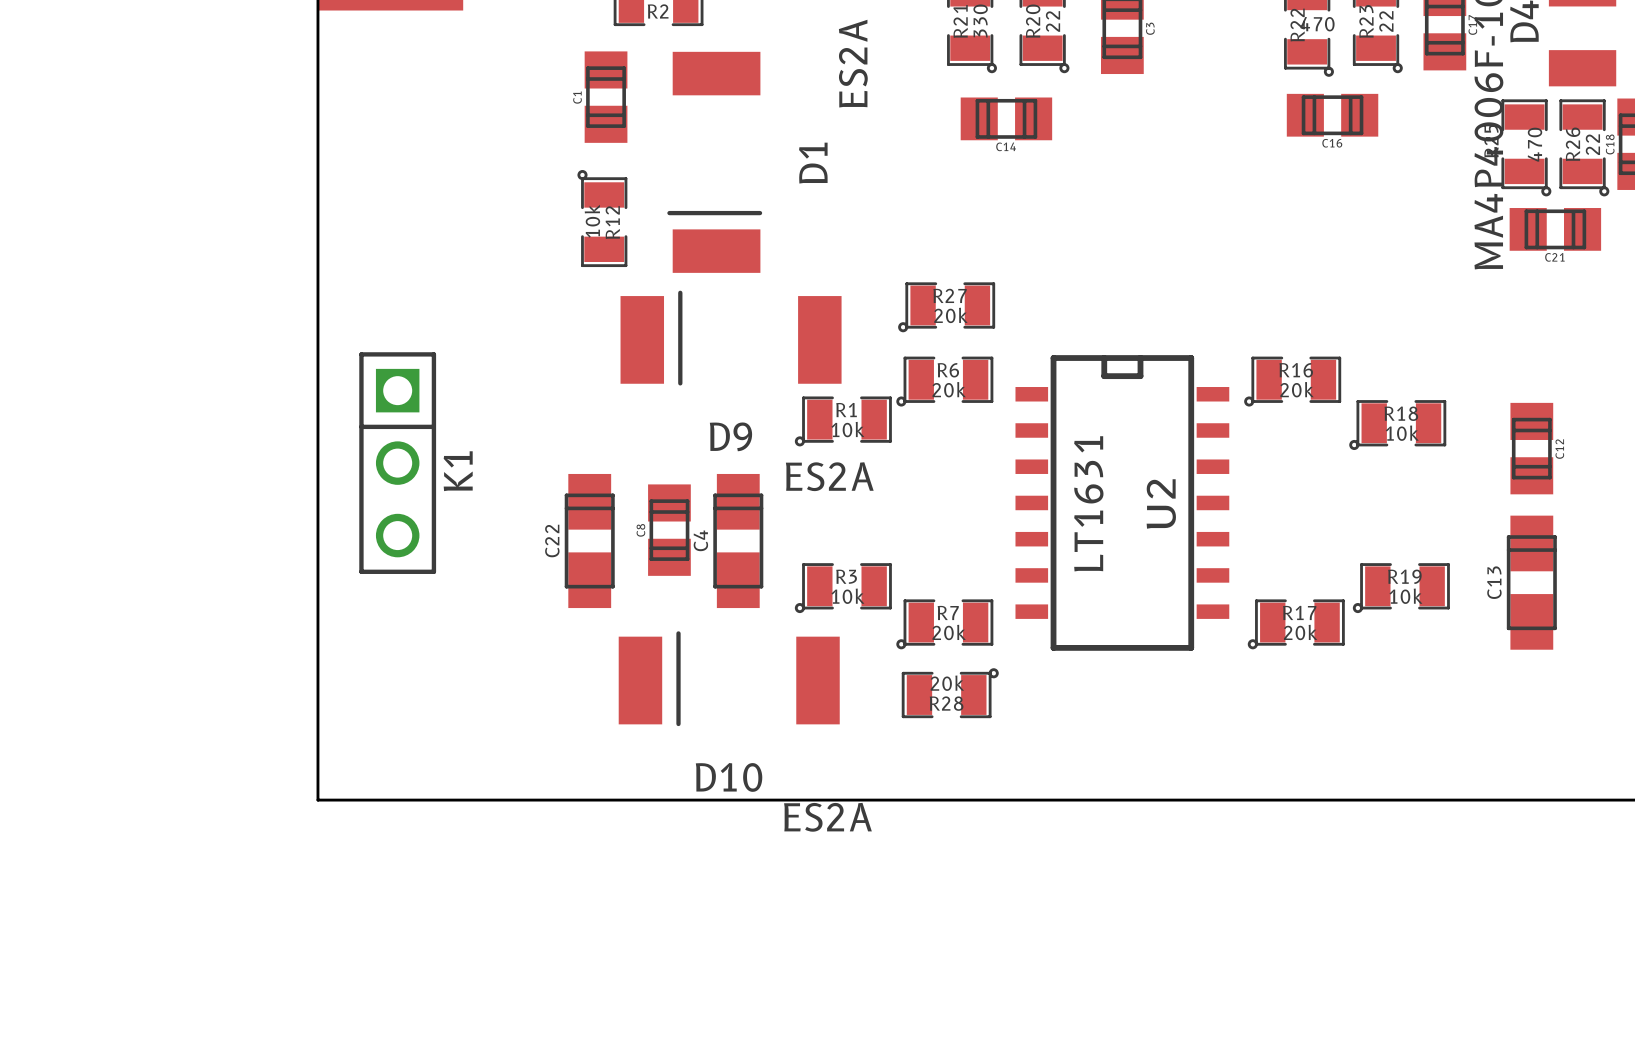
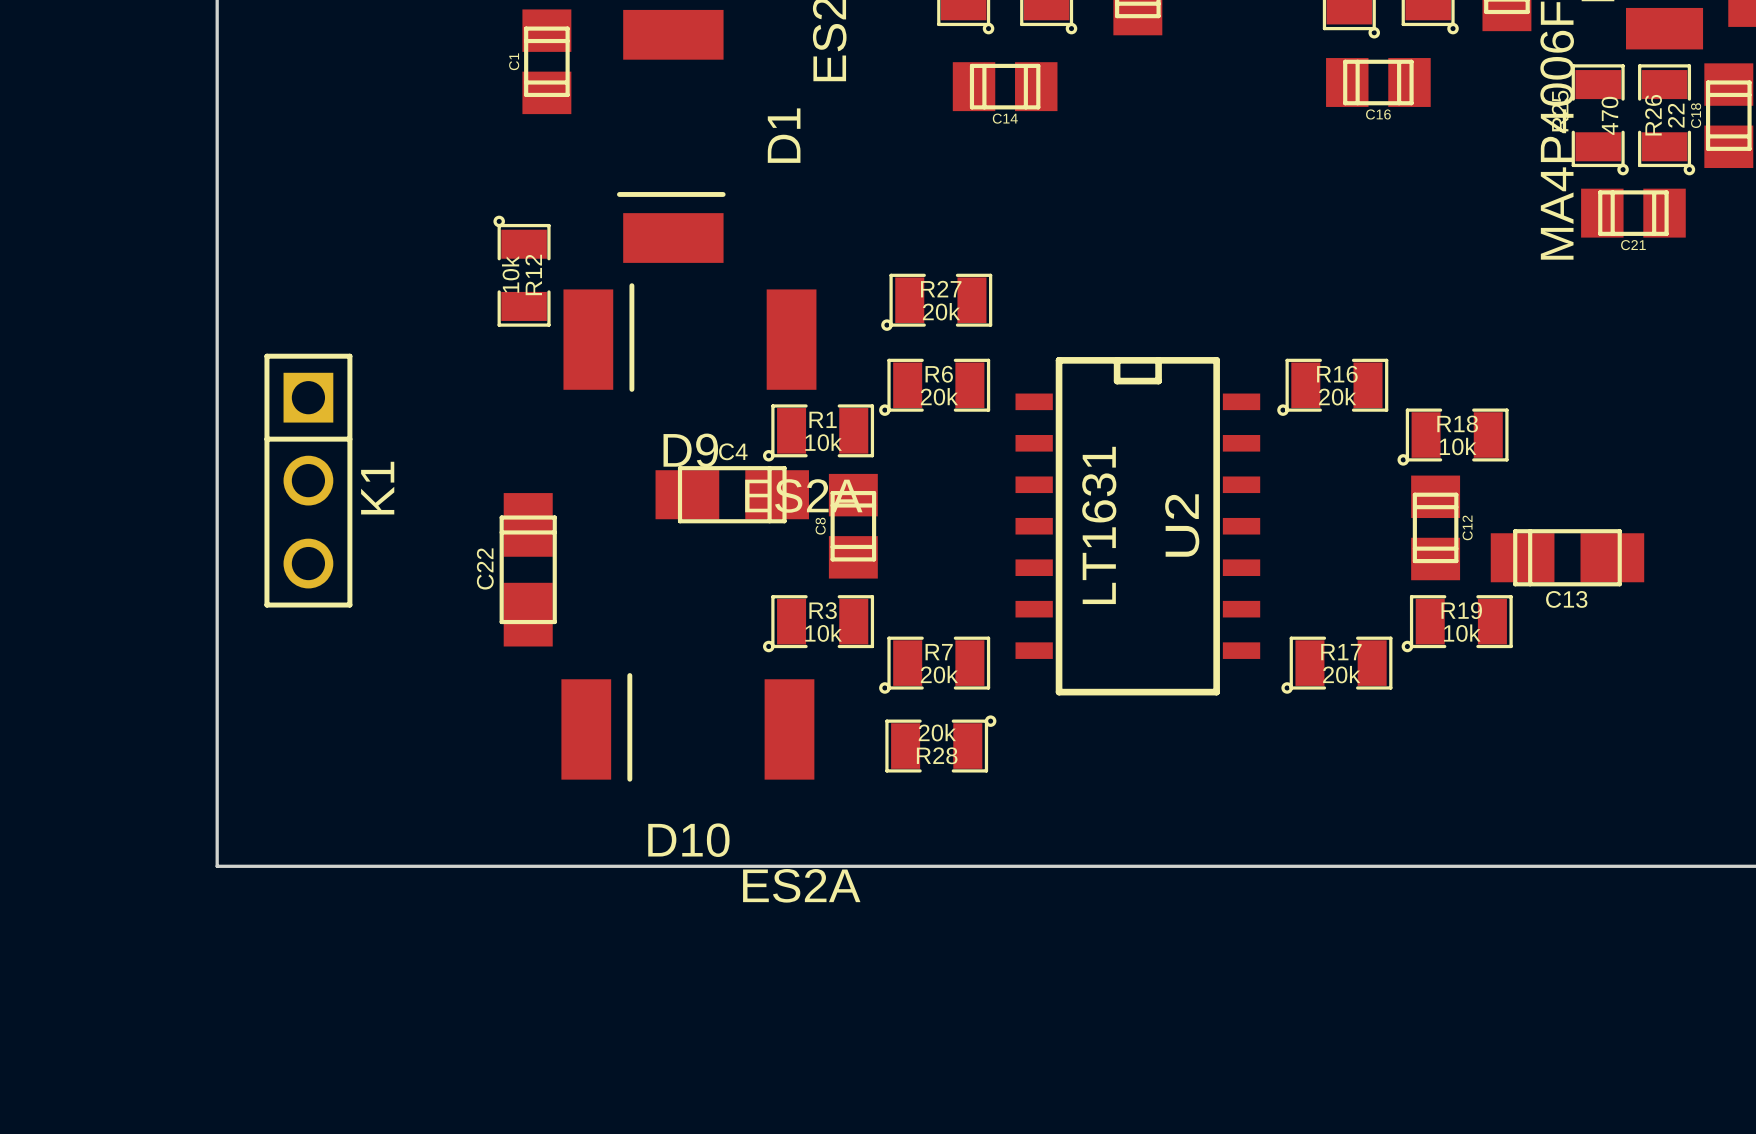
R12 position: (602, 218) -> (522, 271)
C12 position: (1531, 448) -> (1435, 527)
C8 position: (669, 530) -> (853, 526)
C4 rotation: 0° (738, 541) -> 90° clockwise (732, 494)
C13 rotation: 0° (1531, 582) -> 90° counterclockwise (1567, 557)

